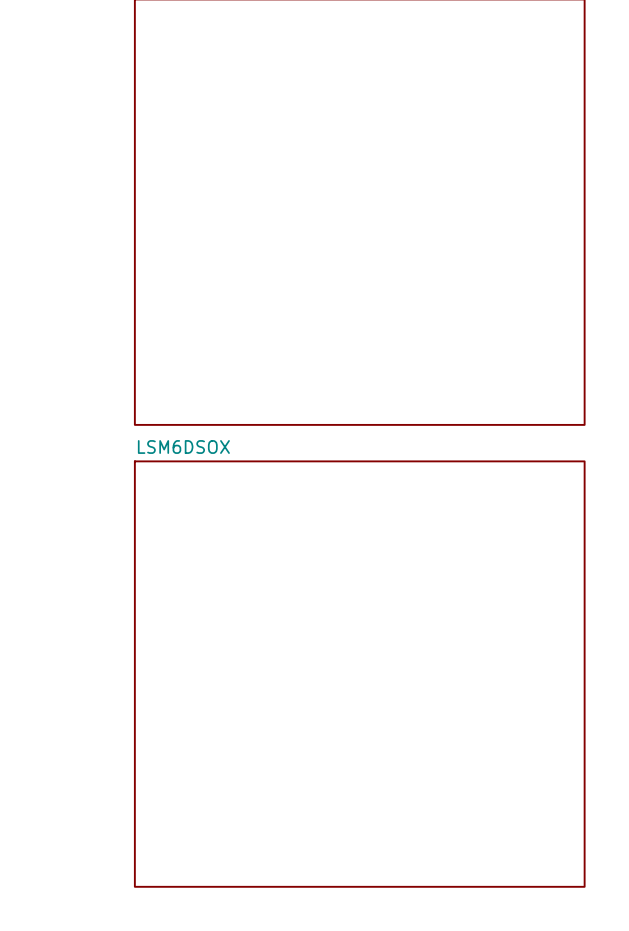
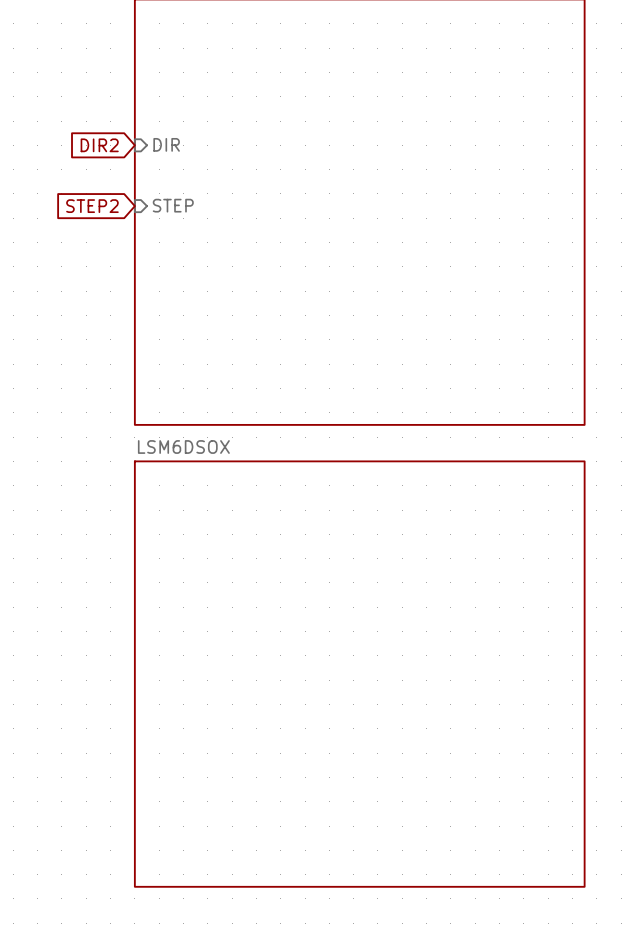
sheet pin: none -> DIR (166, 144)
global label: none -> DIR2 (99, 145)
sheet pin: none -> STEP (173, 205)
global label: none -> STEP2 (92, 206)

